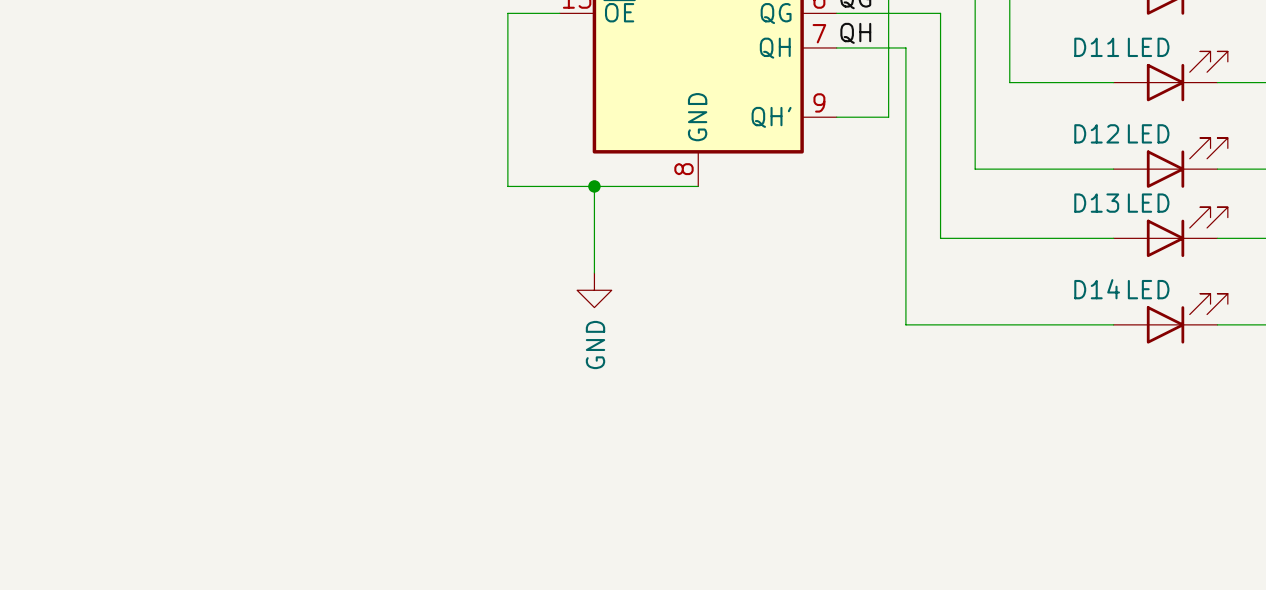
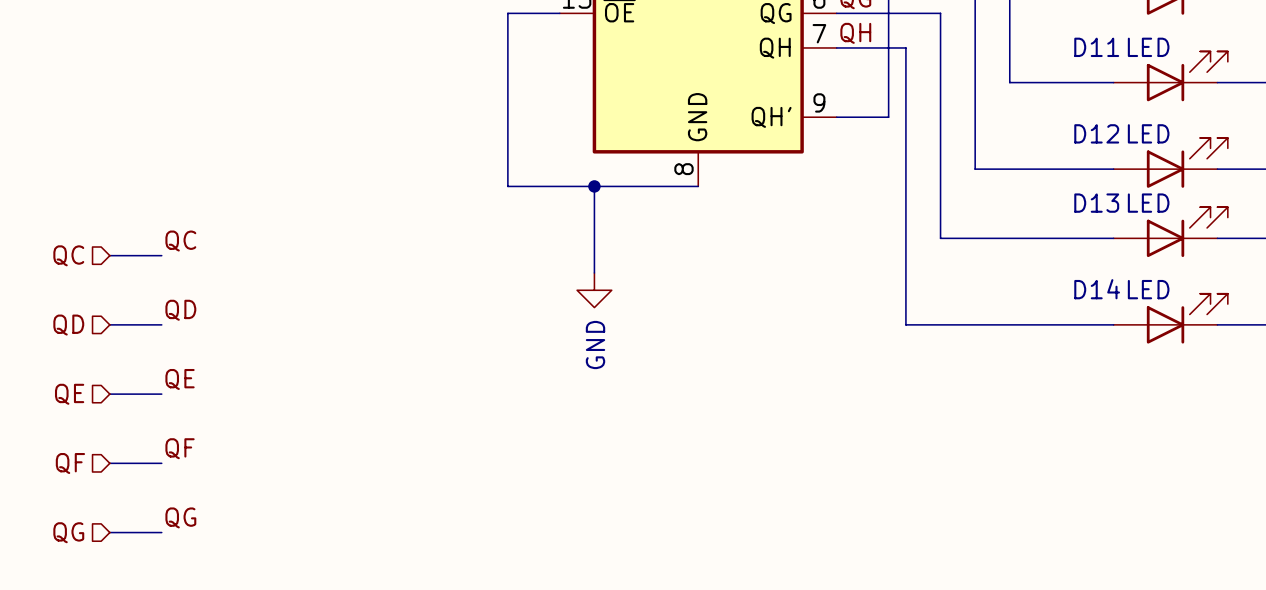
label: none -> QC (180, 241)
hierarchical label: none -> QC (68, 255)
wire: none -> (109, 255) (161, 255)
label: none -> QD (180, 310)
wire: none -> (109, 324) (161, 324)
hierarchical label: none -> QD (68, 325)
label: none -> QE (180, 379)
hierarchical label: none -> QE (69, 394)
wire: none -> (109, 394) (161, 394)
label: none -> QF (180, 448)
hierarchical label: none -> QF (70, 463)
wire: none -> (109, 463) (161, 463)
label: none -> QG (180, 517)
hierarchical label: none -> QG (68, 532)
wire: none -> (109, 532) (161, 532)

